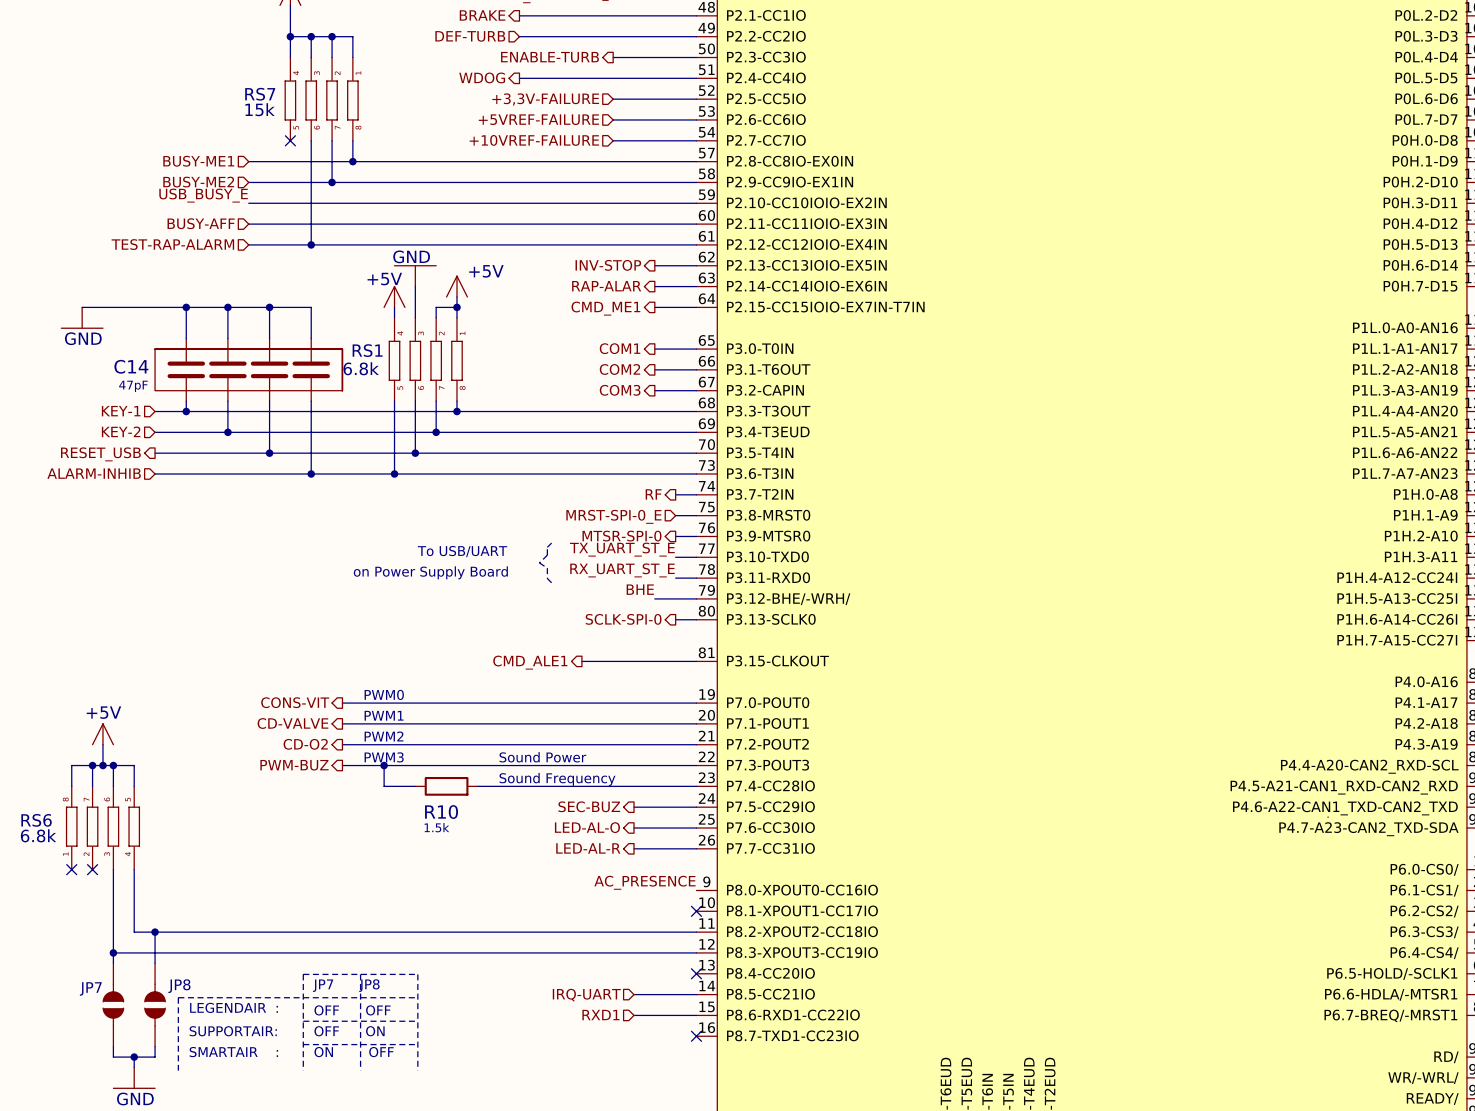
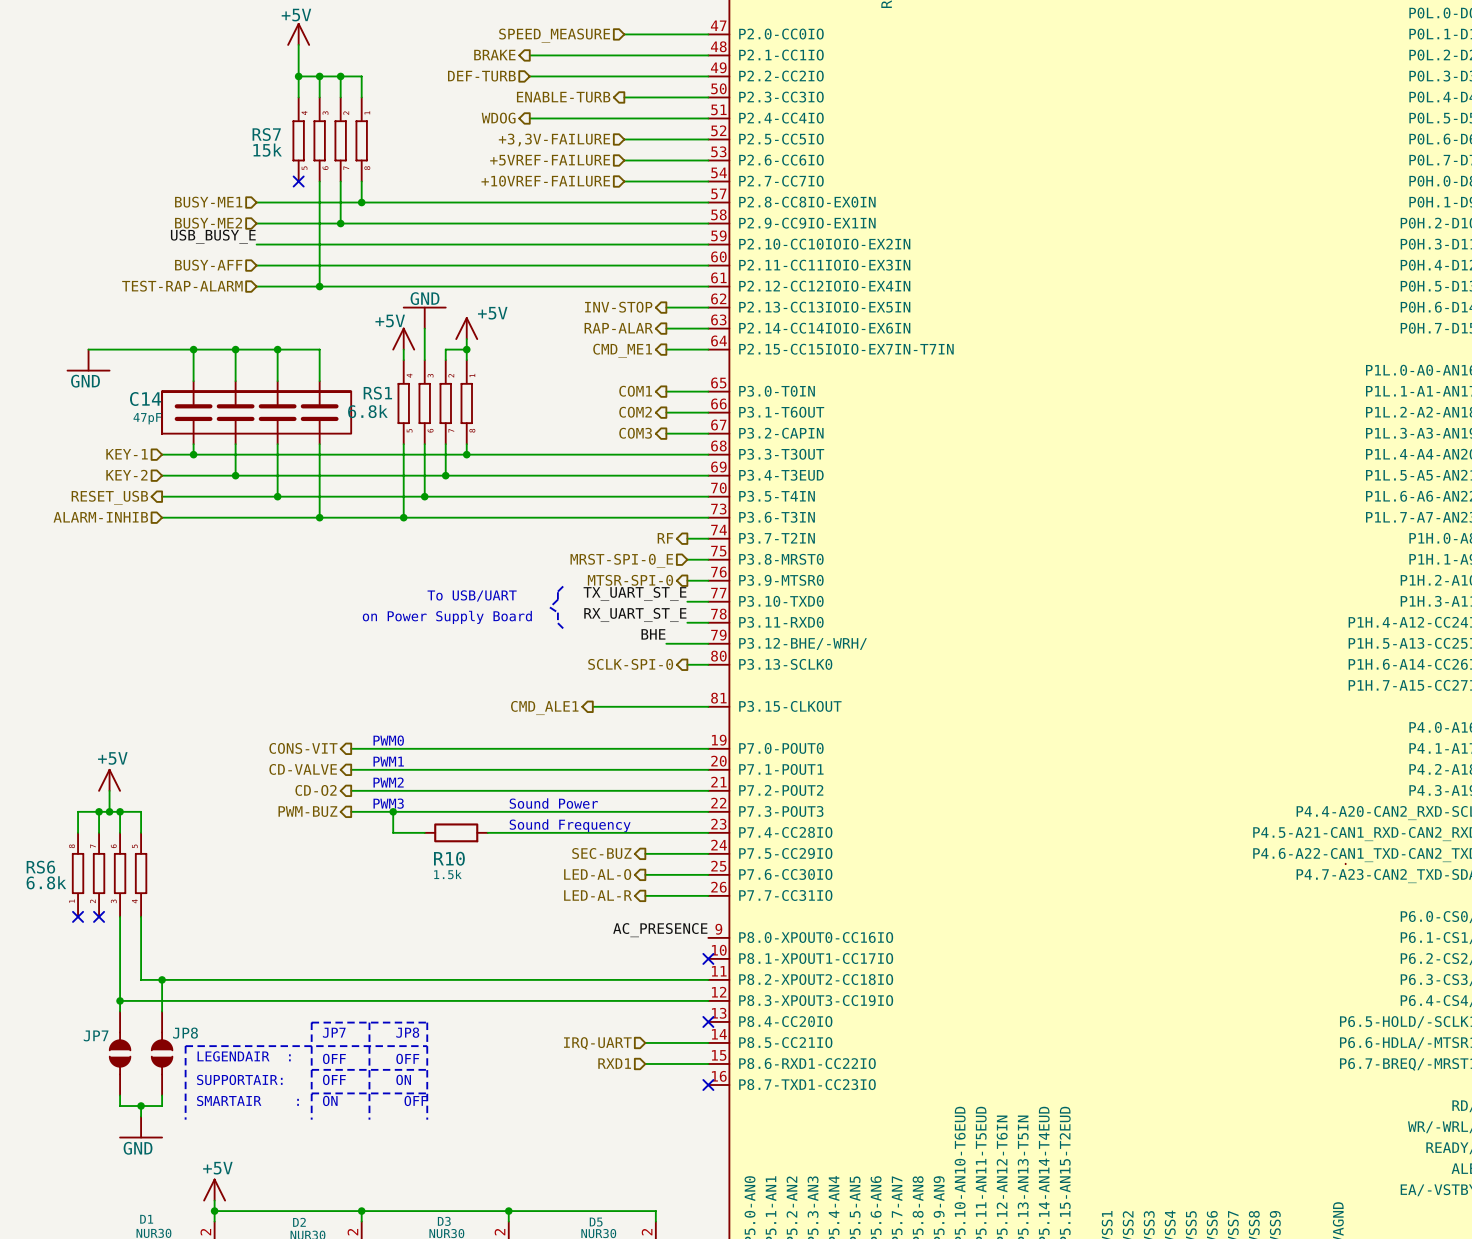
C14 rotation: 0° (248, 369) -> 180° (256, 412)

